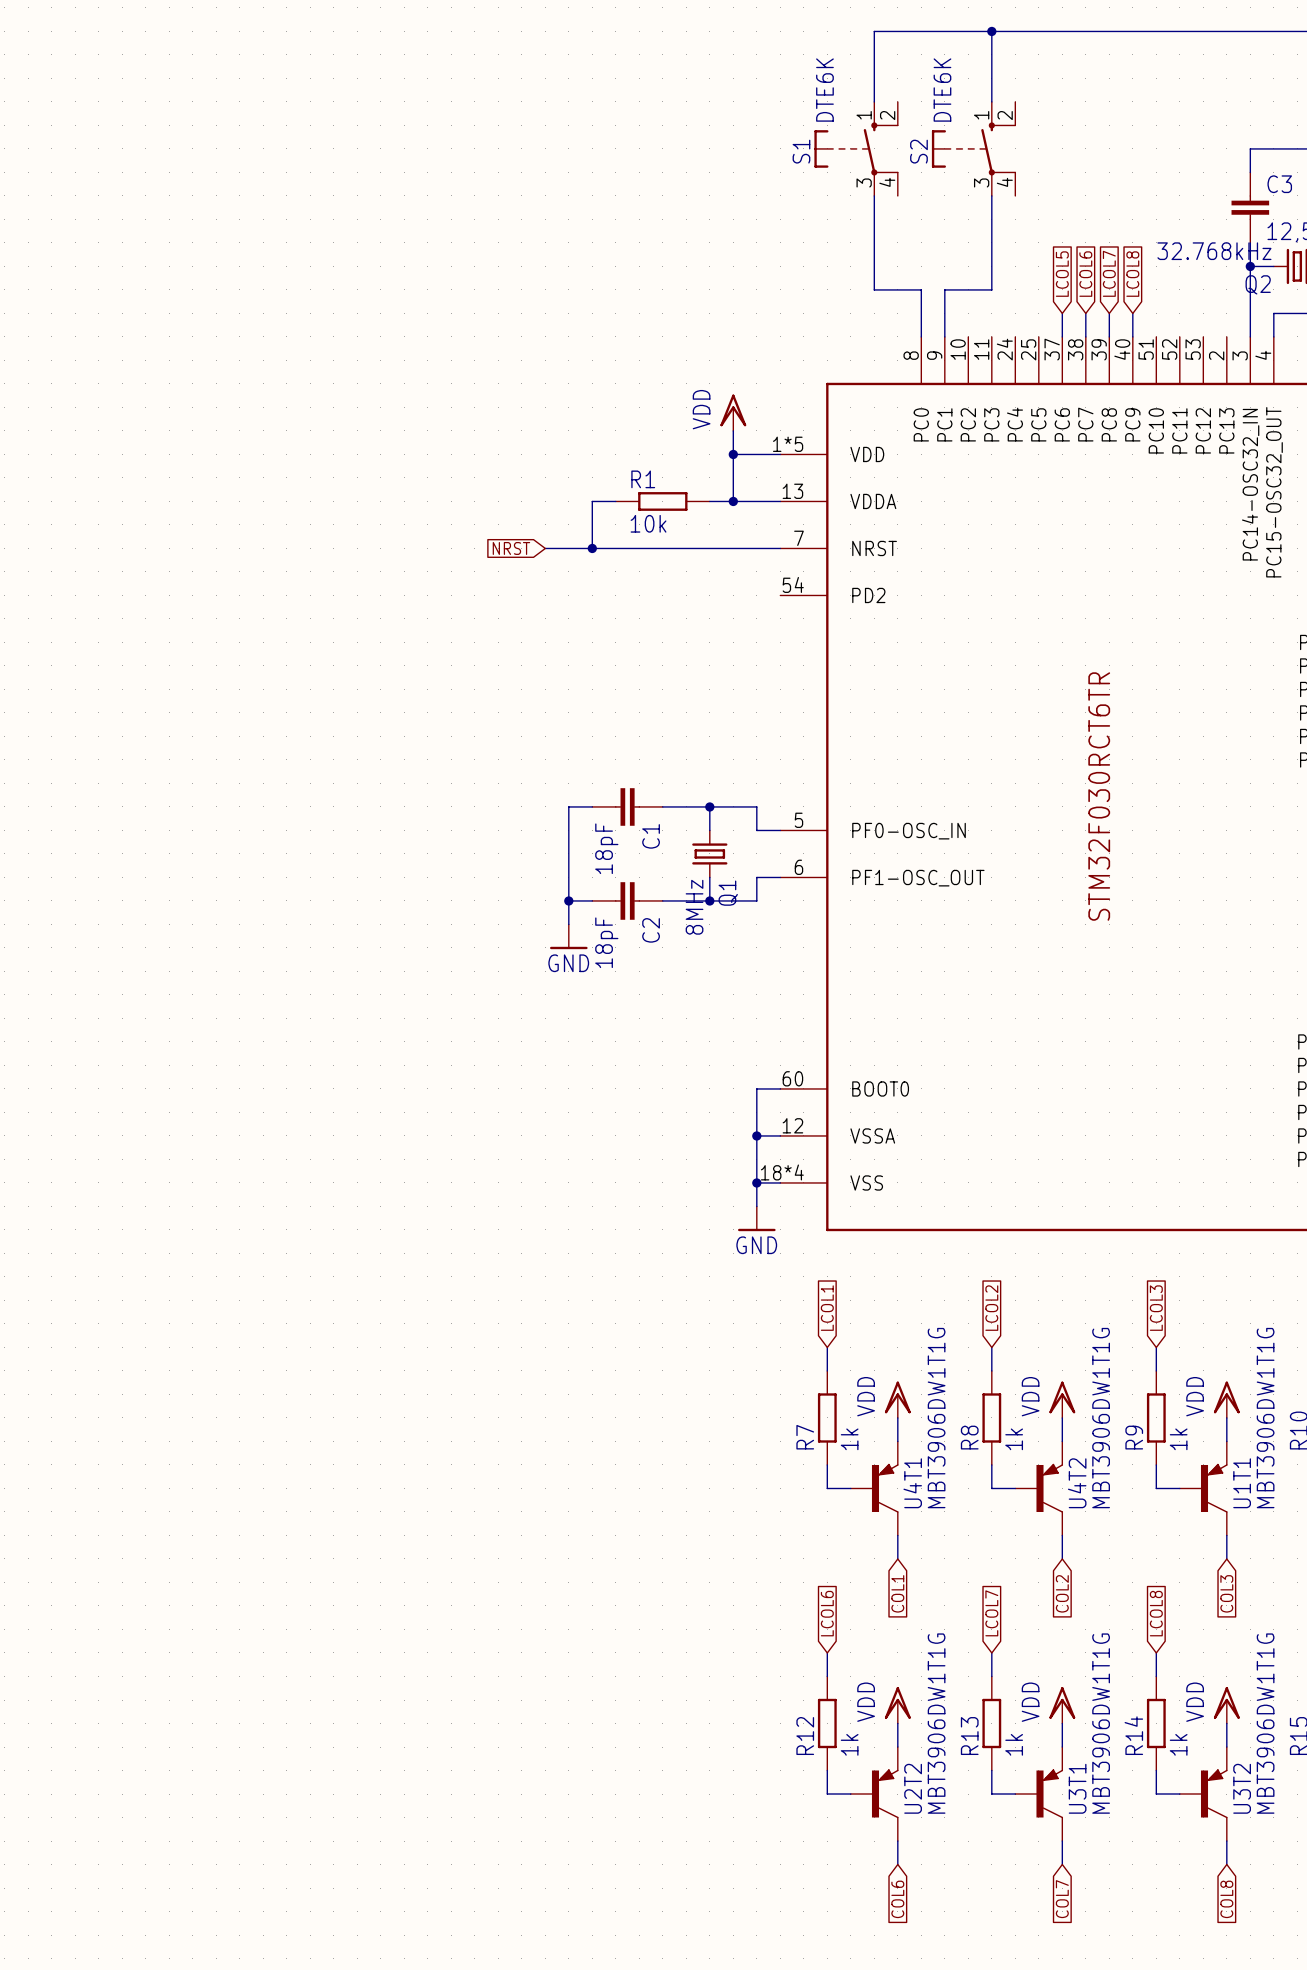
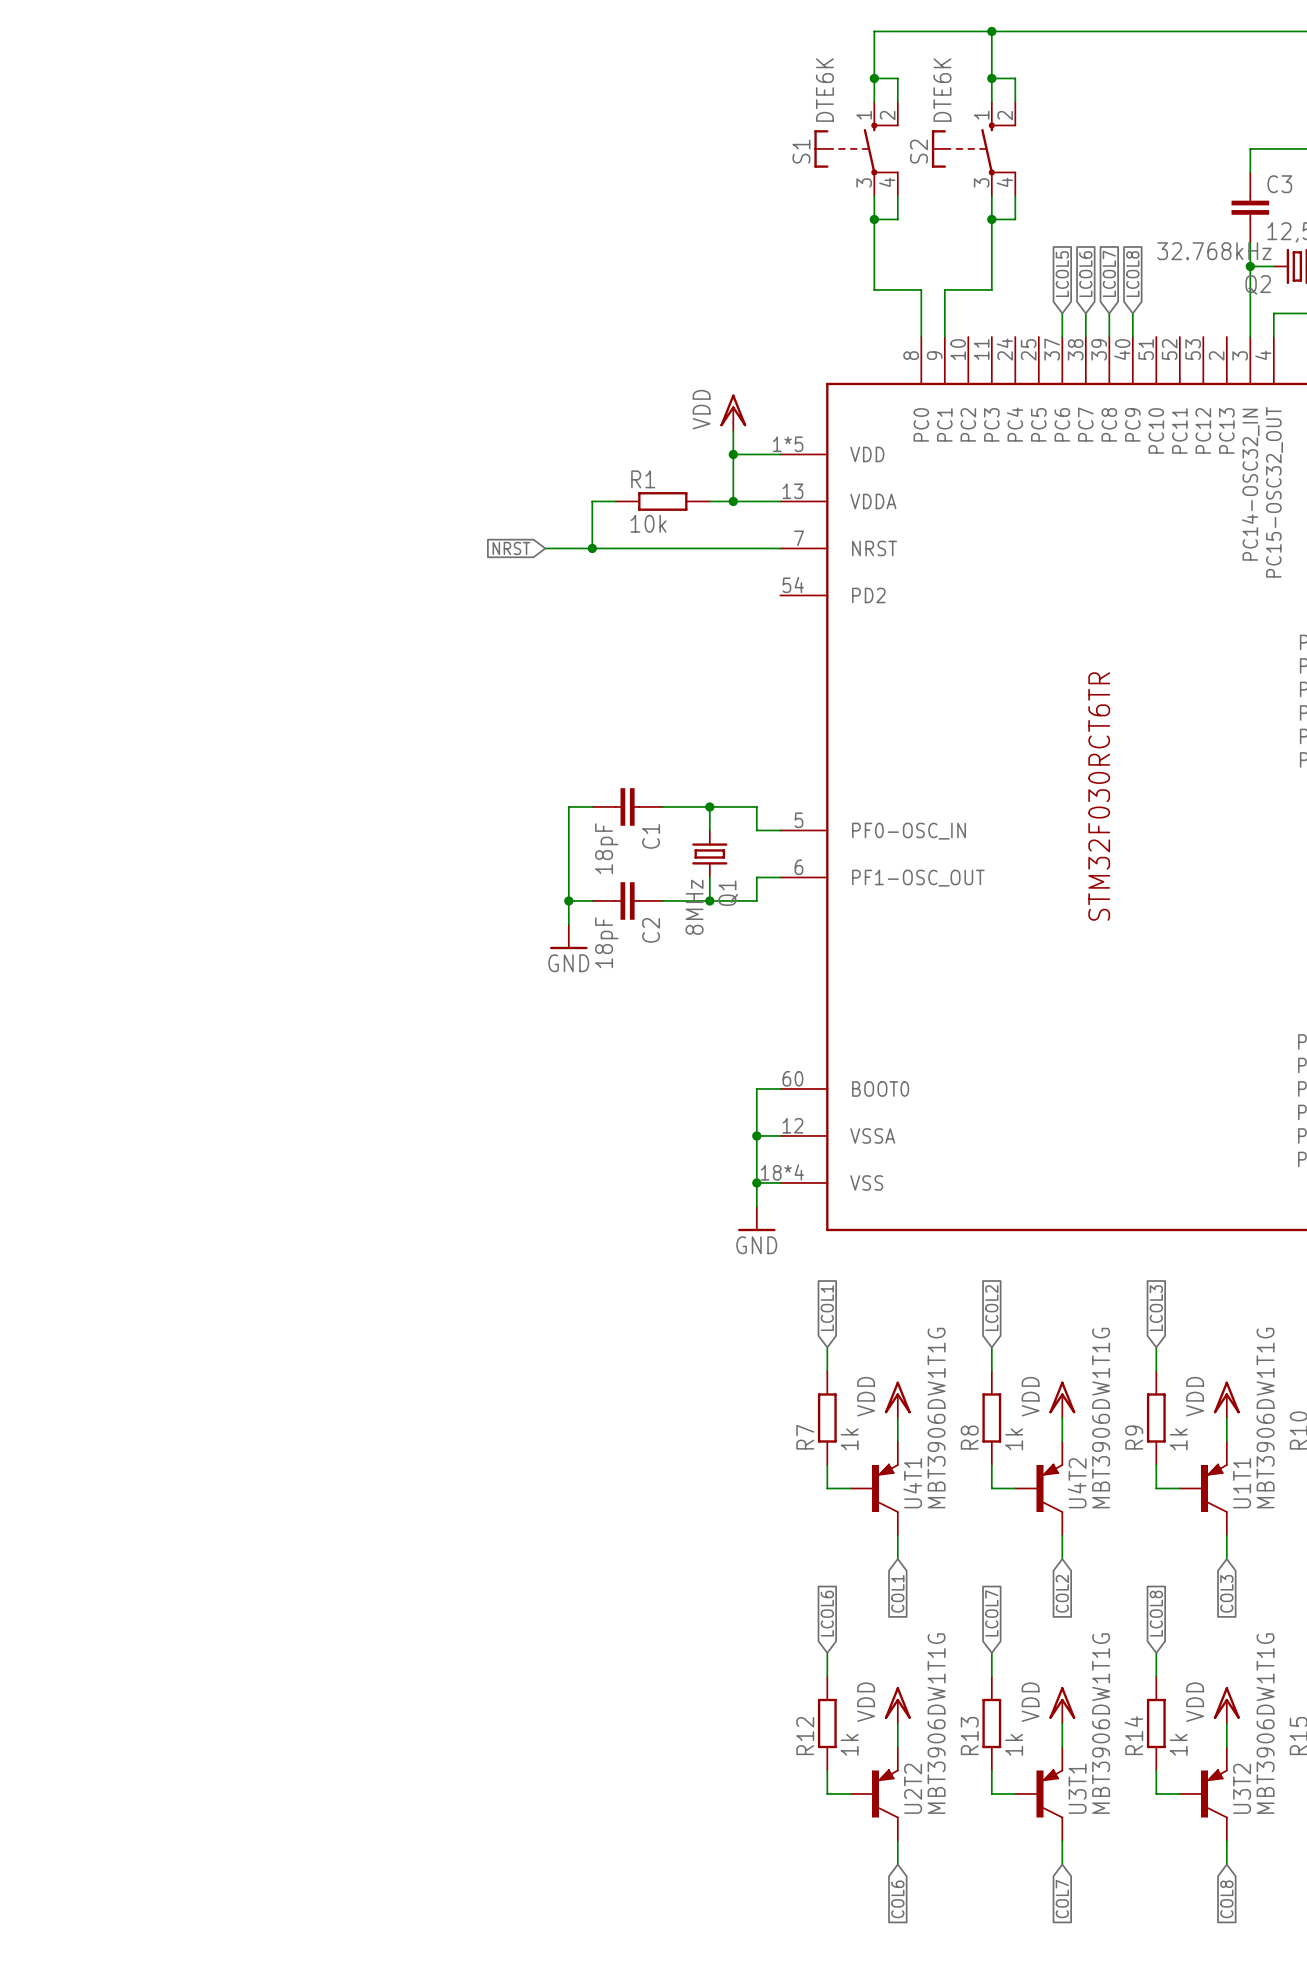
wire: none -> (874, 78) (897, 78) (897, 101)
junction: none -> (874, 78)
wire: none -> (991, 78) (1015, 78) (1015, 101)
junction: none -> (991, 78)
wire: none -> (897, 195) (897, 219) (874, 219)
wire: none -> (1015, 195) (1015, 219) (991, 219)
junction: none -> (874, 219)
junction: none -> (991, 219)

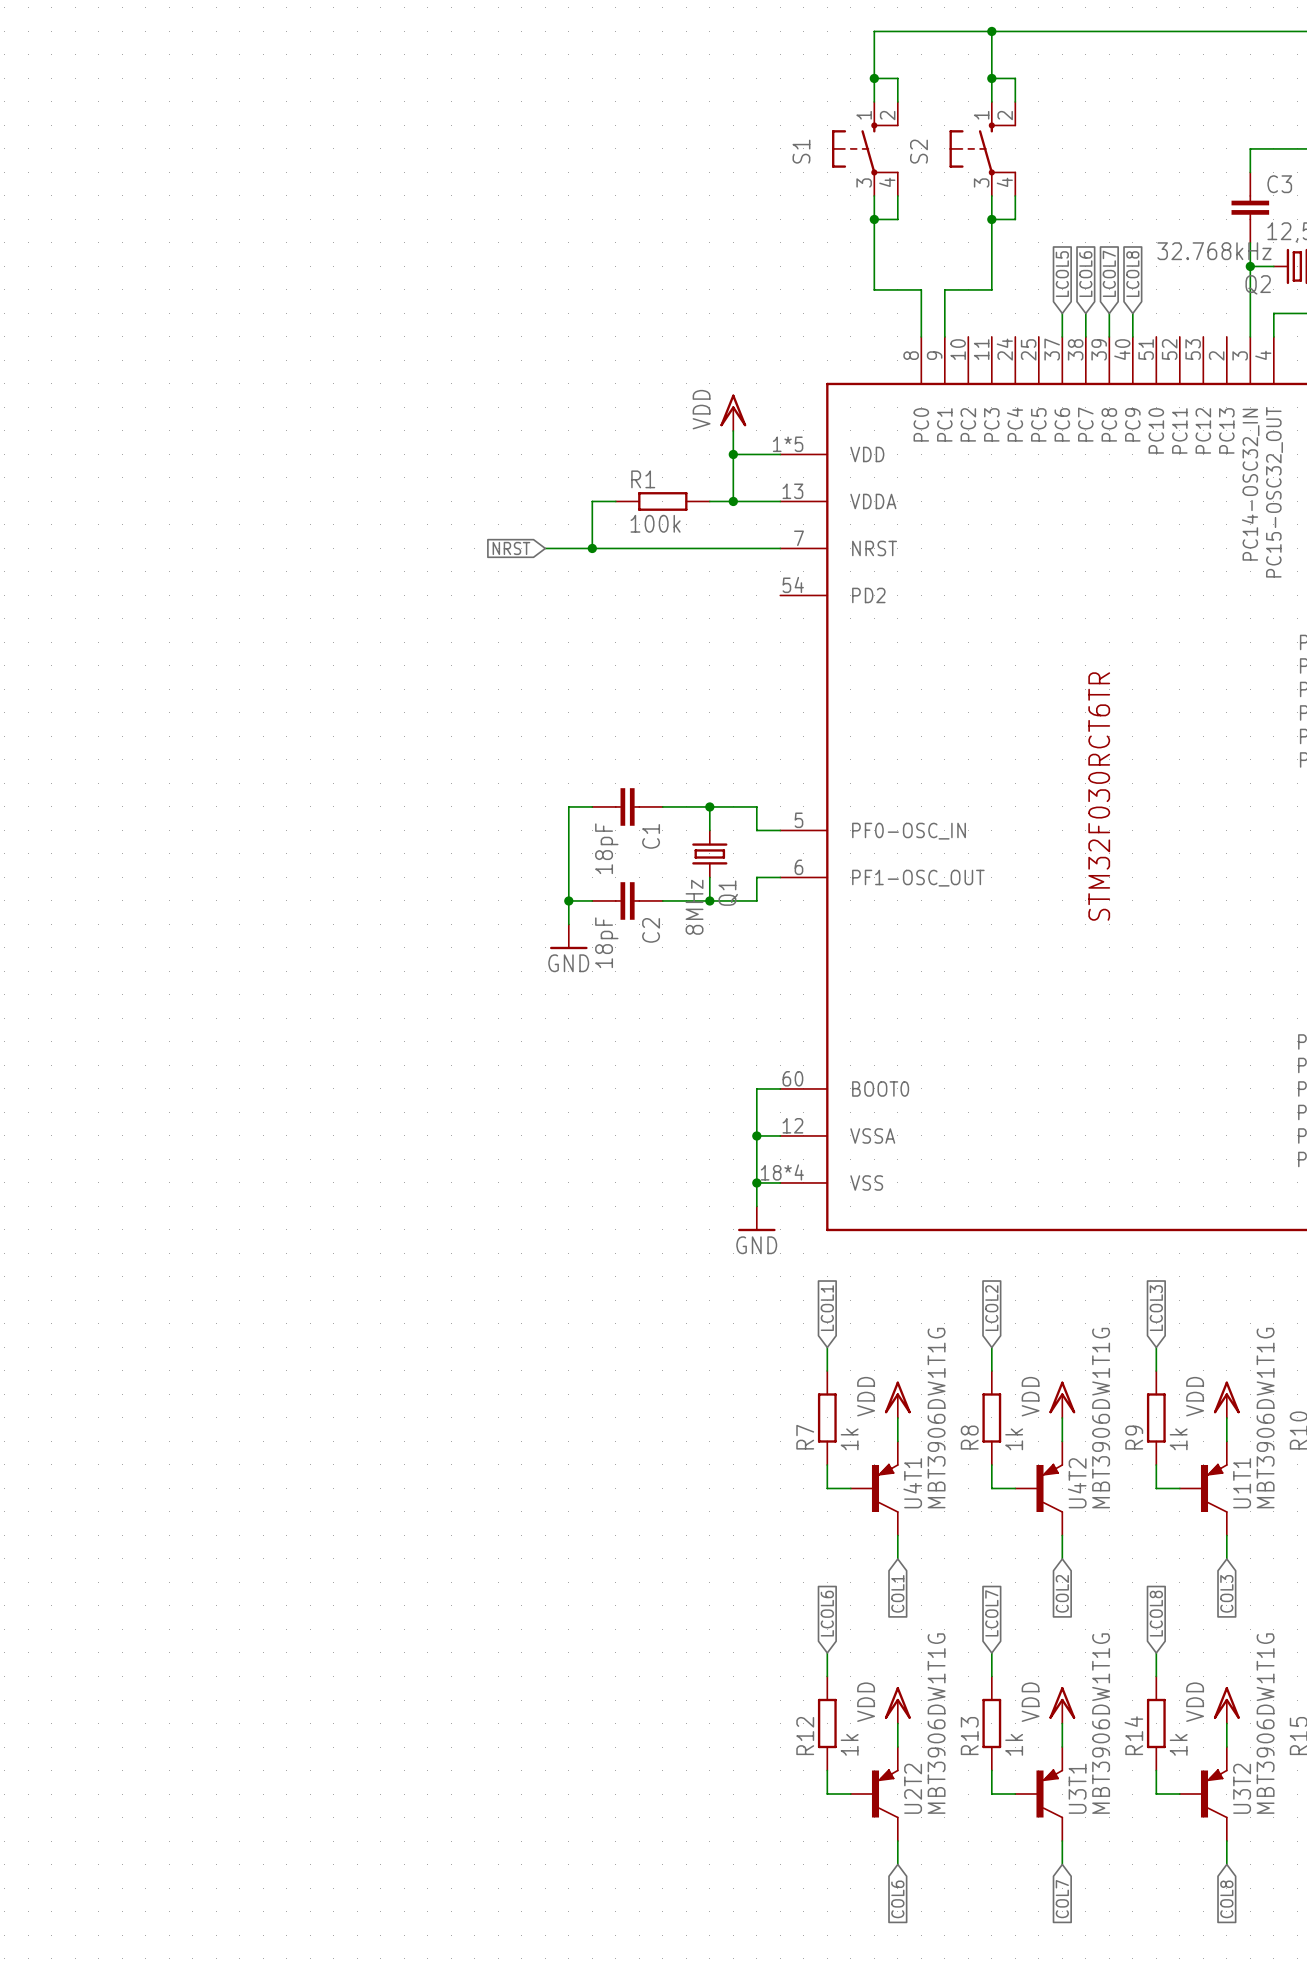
S1 value: DTE6K (824, 90) -> none
S2 value: DTE6K (942, 90) -> none
S1 symbol: [814, 101, 899, 196] -> [832, 101, 899, 196]
S2 symbol: [931, 101, 1017, 196] -> [949, 101, 1017, 196]
R1 value: 10k (648, 523) -> 100k (655, 523)

